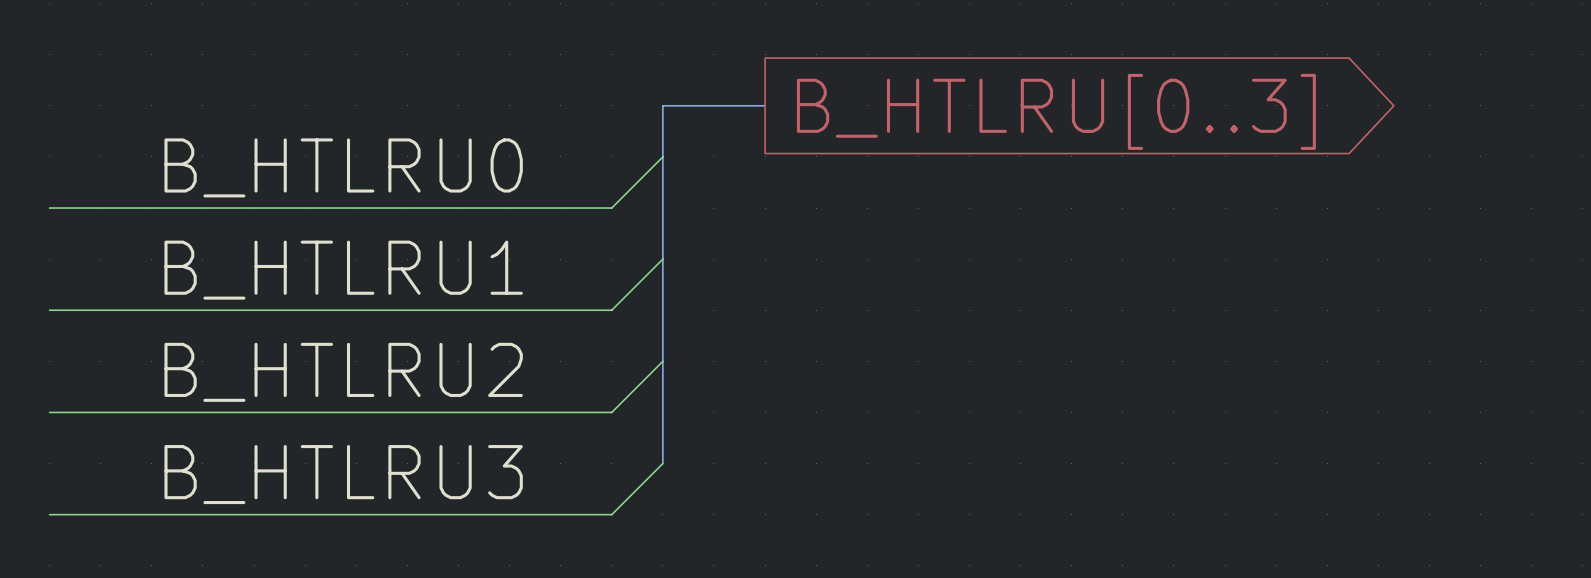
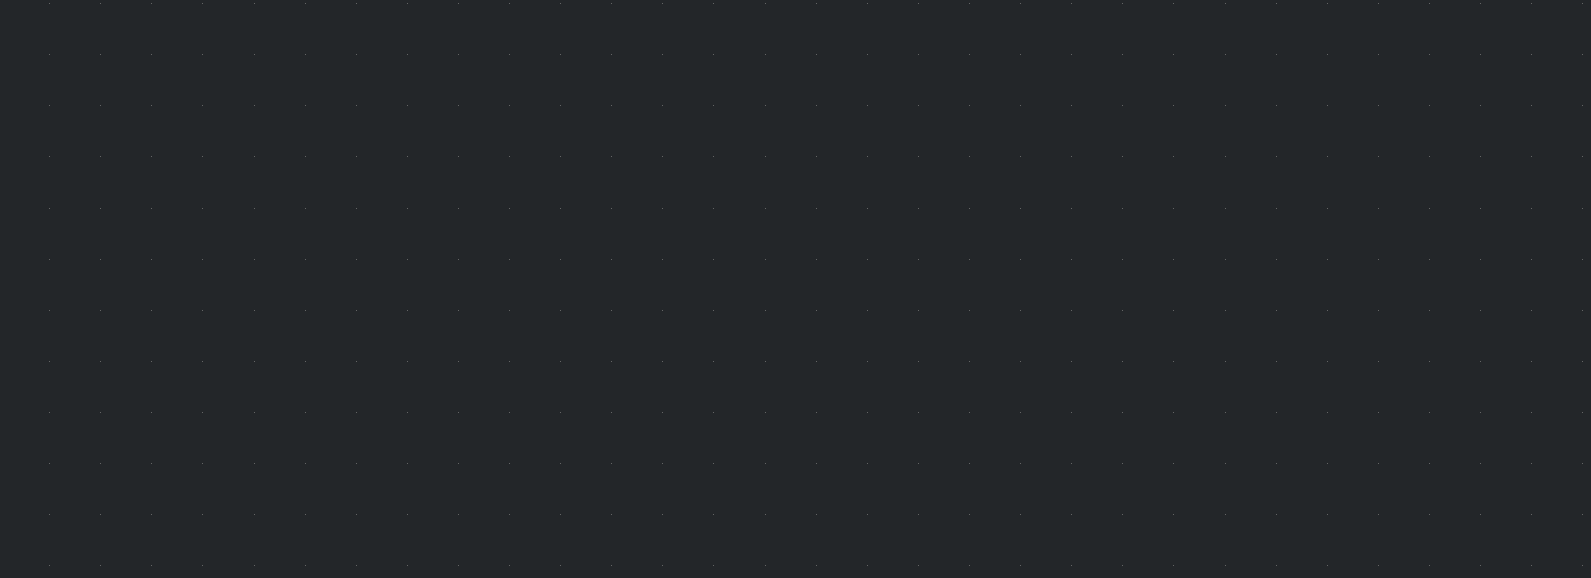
bus: (765, 105) (662, 105) (662, 463) -> none
global label: B_HTLRU[0..3] (1056, 111) -> none
wire: (662, 156) (611, 208) (49, 208) -> none
label: B_HTLRU0 (343, 167) -> none
wire: (662, 259) (611, 310) (49, 310) -> none
label: B_HTLRU1 (343, 270) -> none
wire: (662, 361) (611, 412) (49, 412) -> none
label: B_HTLRU2 (343, 372) -> none
wire: (662, 463) (611, 514) (49, 514) -> none
label: B_HTLRU3 (343, 474) -> none

